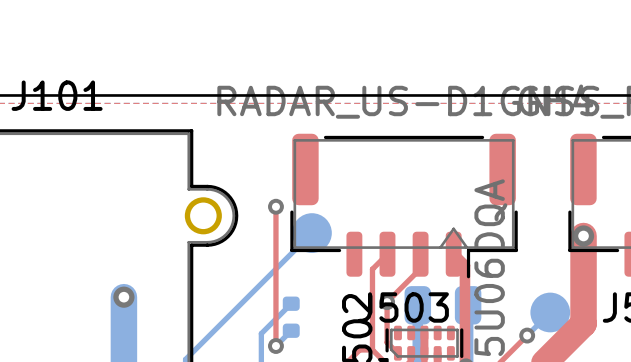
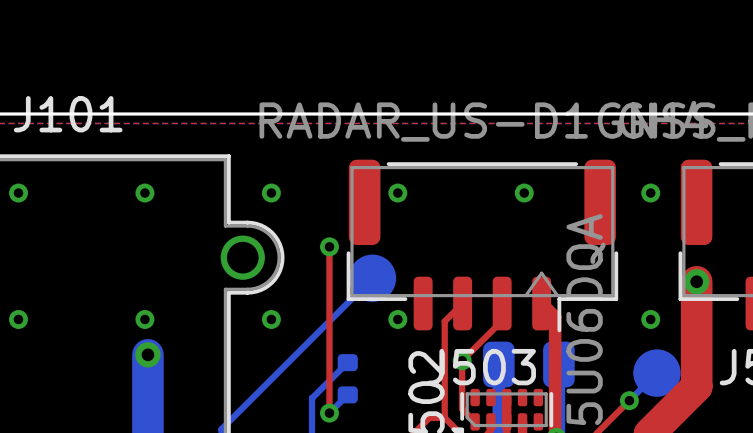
via: none -> (18, 193)
via: none -> (144, 193)
via: none -> (271, 193)
via: none -> (397, 193)
via: none -> (524, 193)
via: none -> (650, 193)
via: none -> (18, 319)
via: none -> (144, 319)
via: none -> (271, 319)
via: none -> (397, 319)
via: none -> (650, 319)

